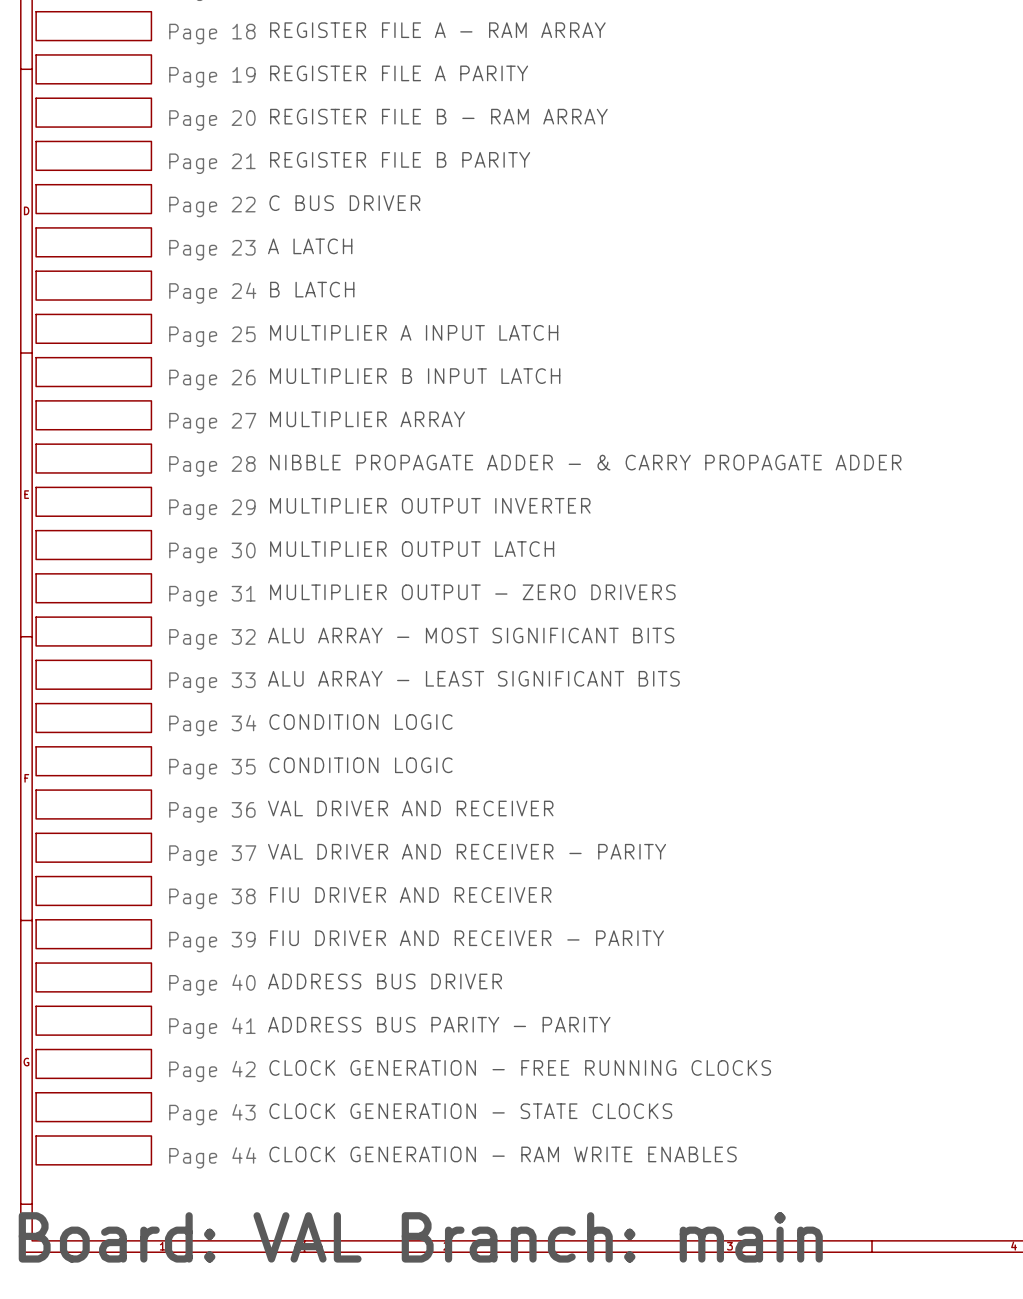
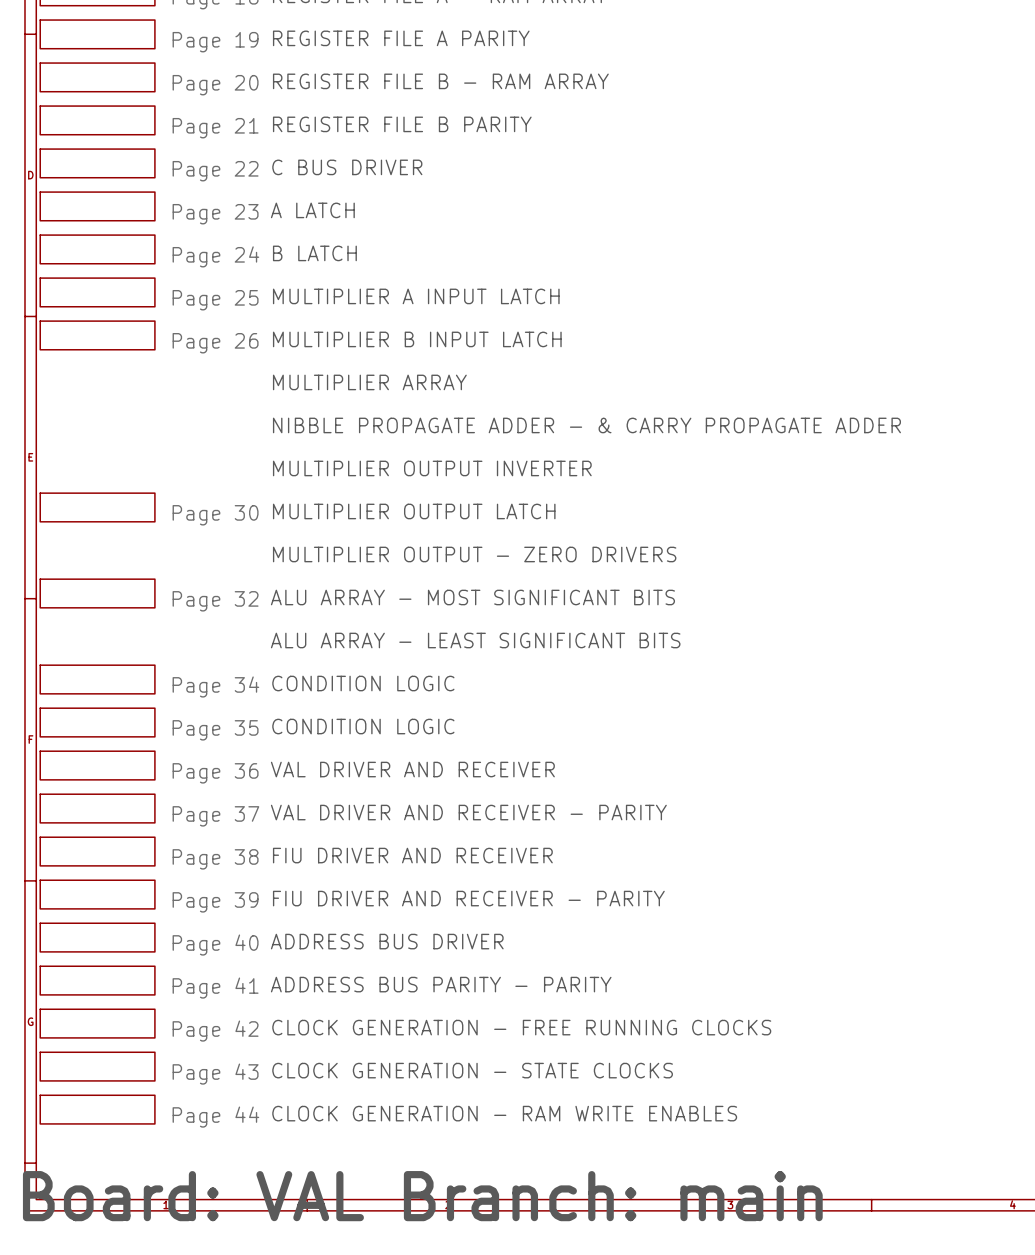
sheet Page 27: (93, 415) -> none
sheet Page 28: (93, 458) -> none
sheet Page 29: (93, 501) -> none
sheet Page 31: (93, 588) -> none
sheet Page 33: (93, 674) -> none

